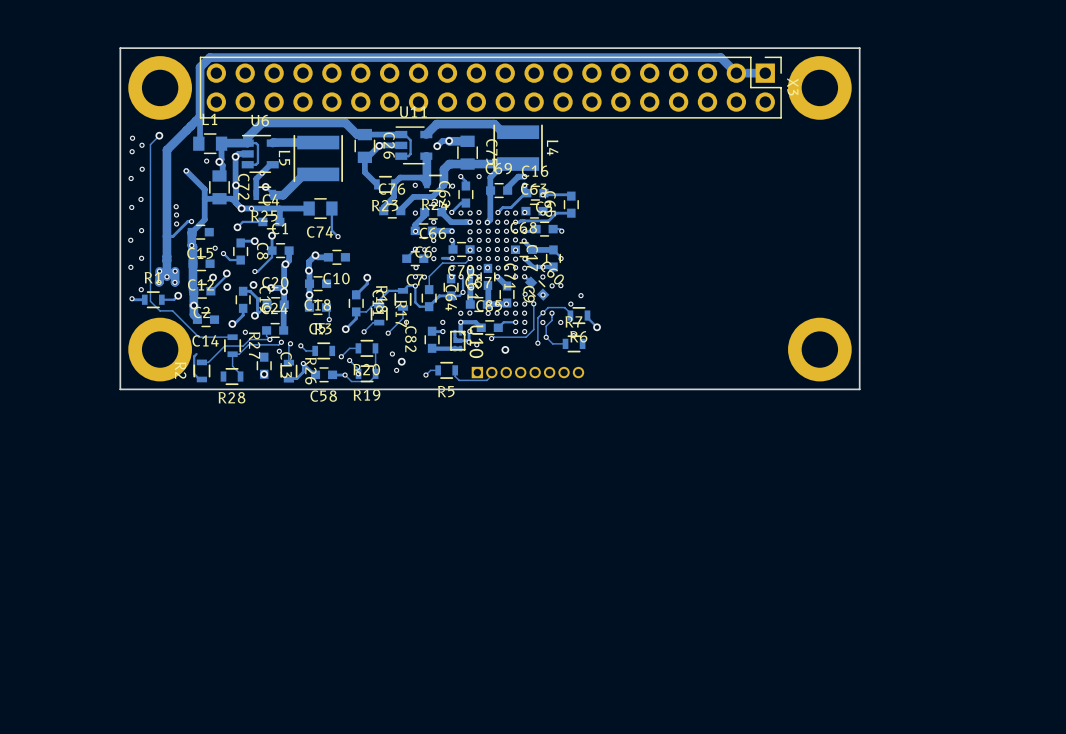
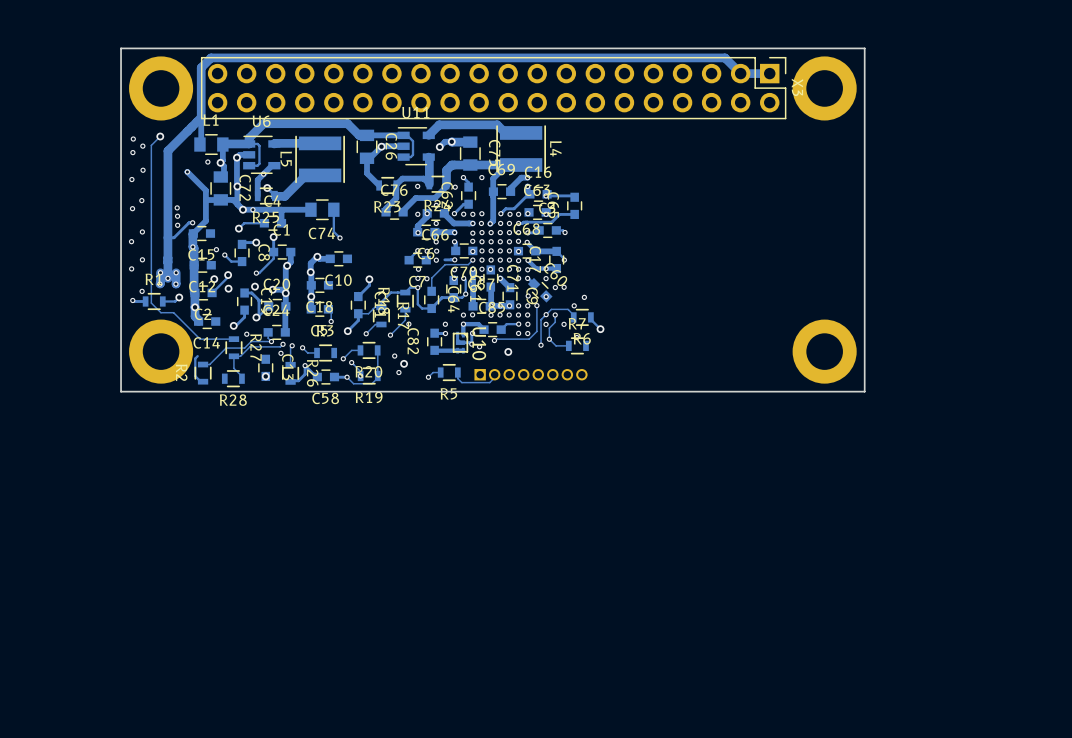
via: none -> (427, 213)

